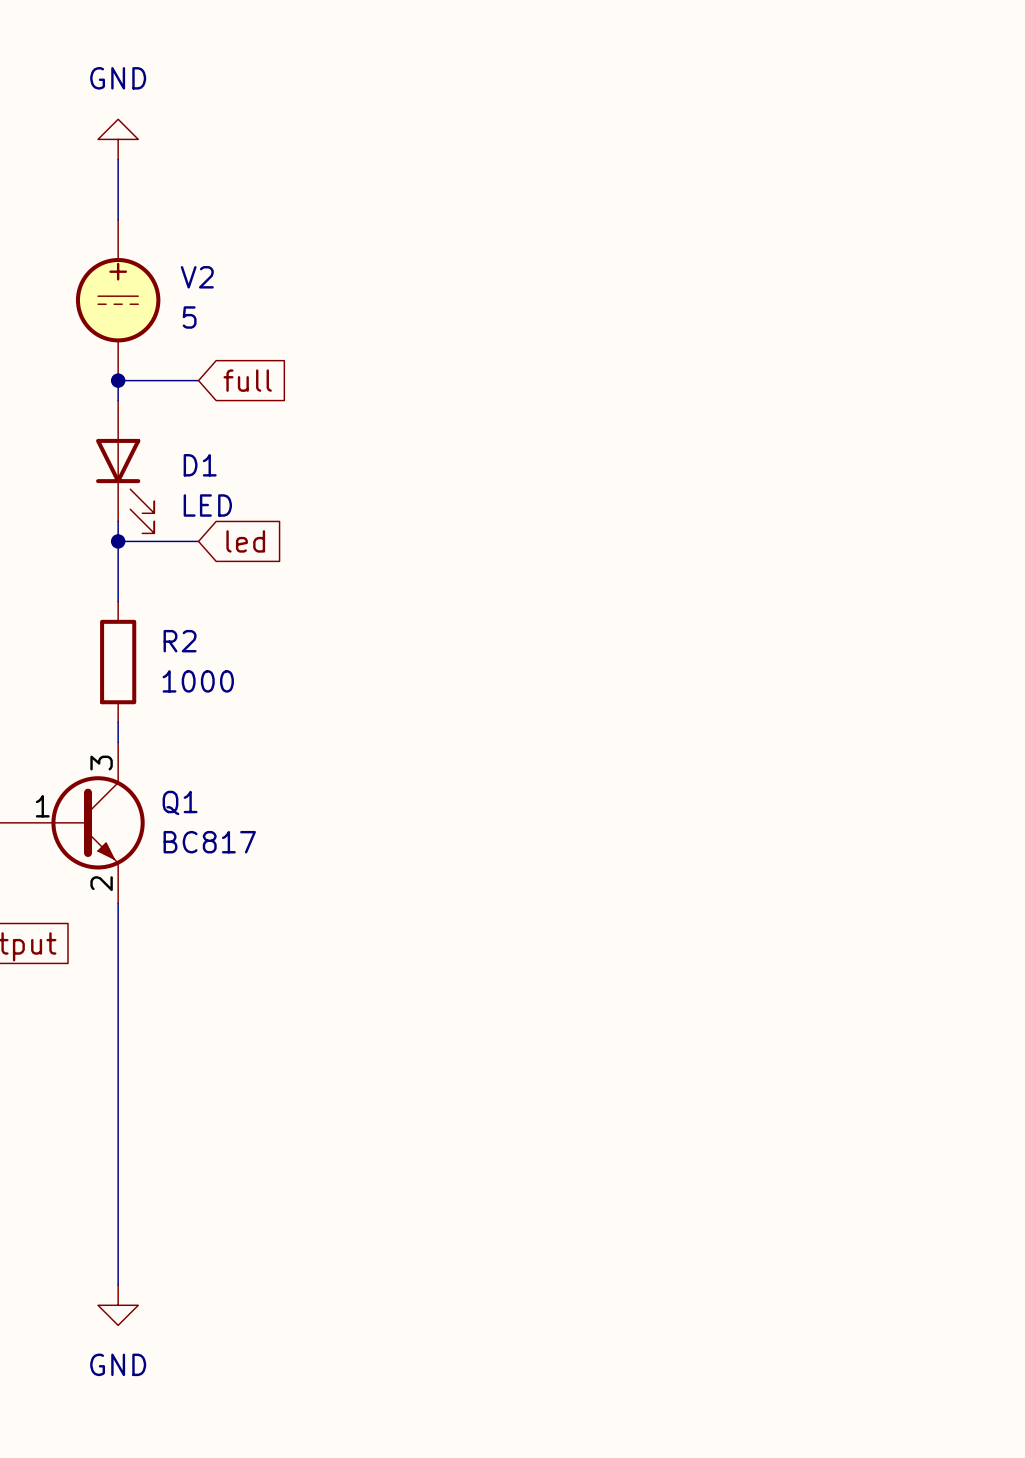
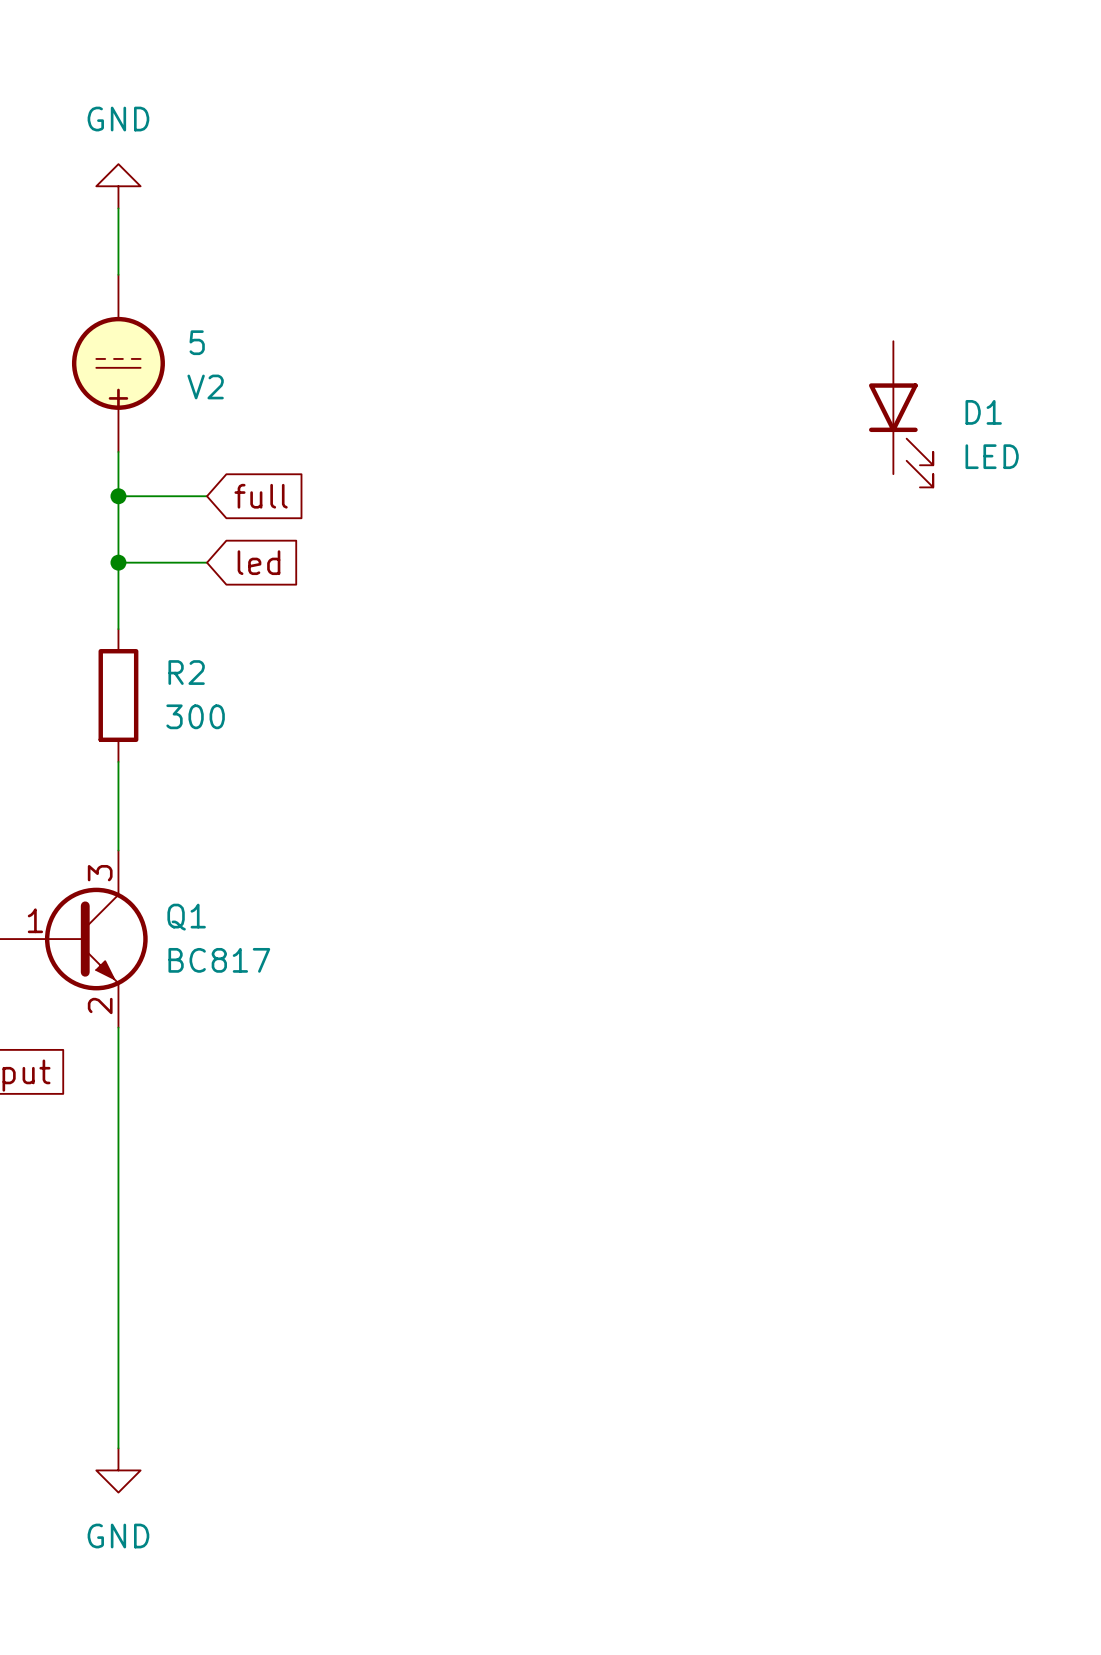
V2 name position: V2 (197, 277) -> V2 (205, 386)
V2 rotation: 0° (118, 300) -> 180° (118, 363)
V2 value position: 5 (189, 317) -> 5 (197, 342)
wire: (118, 380) (198, 380) -> (118, 496) (207, 496)
junction position: (118, 380) -> (118, 496)
global label position: full (247, 380) -> full (261, 496)
D1 position: (125, 467) -> (901, 414)
wire: none -> (118, 562) (207, 562)
junction: none -> (118, 562)
junction: (118, 541) -> none
wire: (198, 541) (118, 541) (118, 601) -> none
global label position: led (245, 541) -> led (258, 562)
wire: none -> (118, 761) (118, 828)
R2 position: (118, 662) -> (118, 695)
R2 value: 1000 (198, 681) -> 300 (195, 716)

